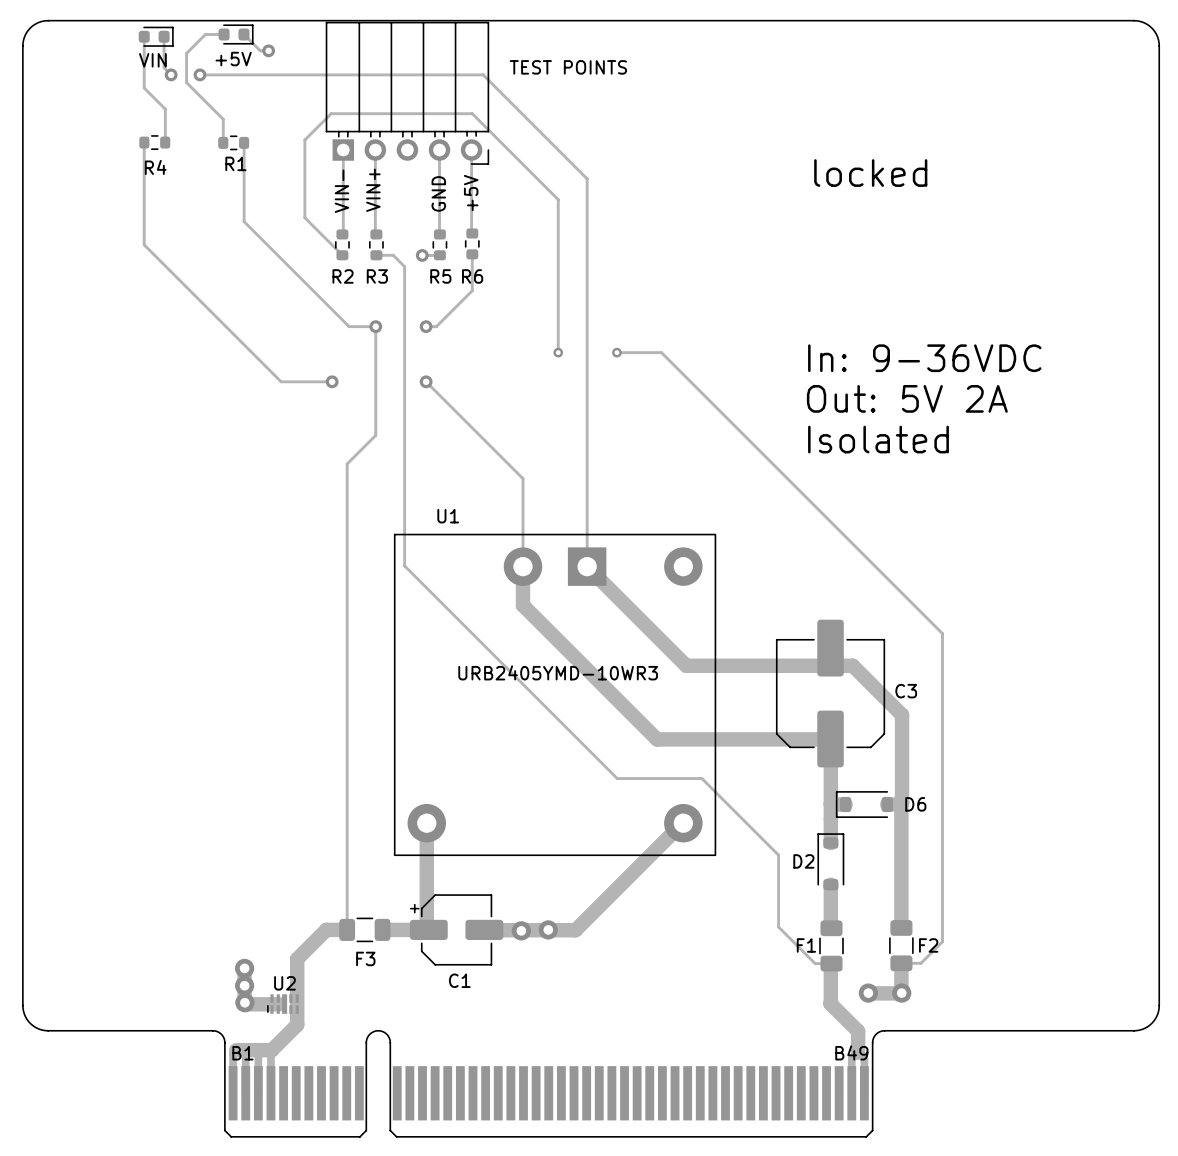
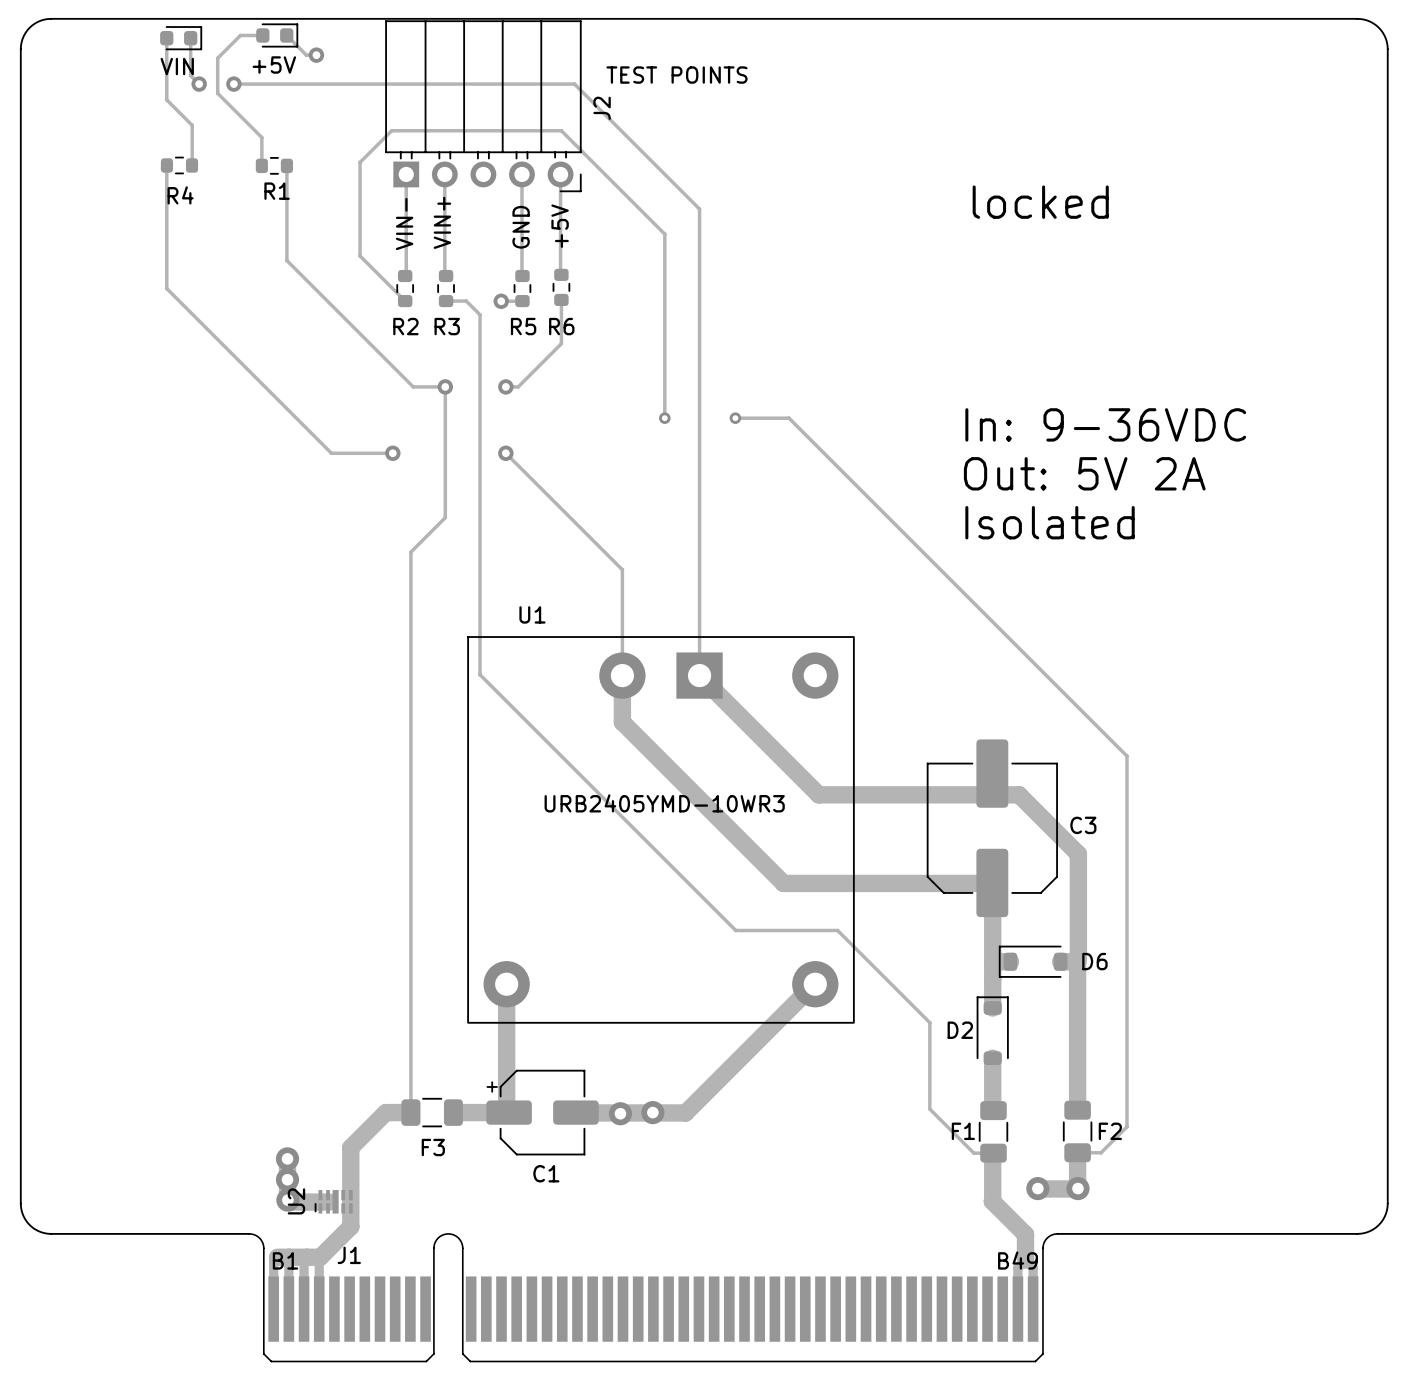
J2 name: none -> J2 (602, 108)
J1: none -> (704, 690)
U2 name rotation: 0° (284, 983) -> 90° counterclockwise (296, 1201)
U2 name position: U2 (284, 983) -> U2 (296, 1201)

